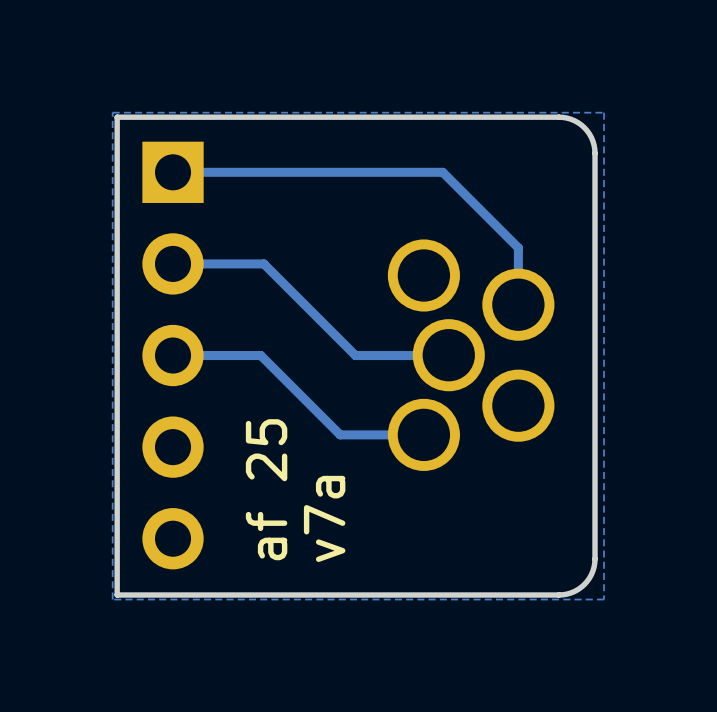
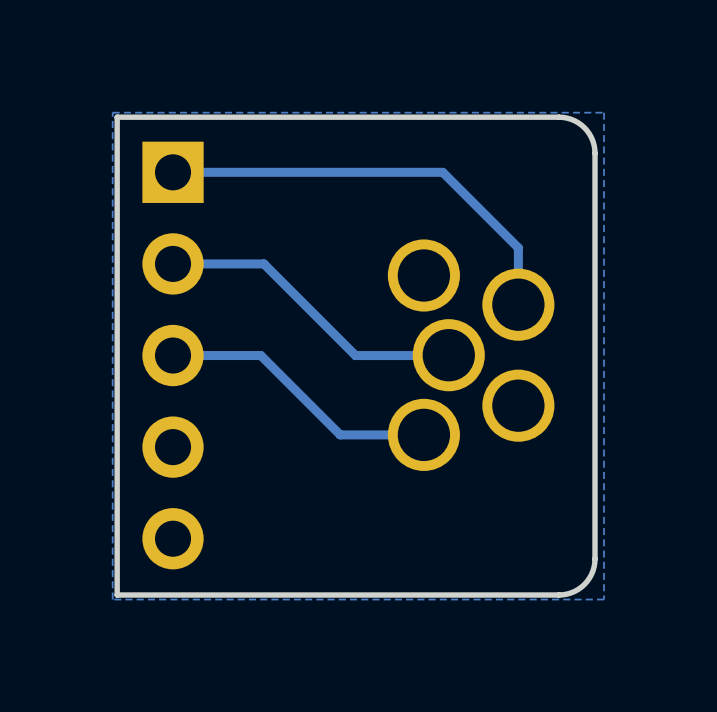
text: af 25 (266, 489) -> none
text: v7a (324, 518) -> none

